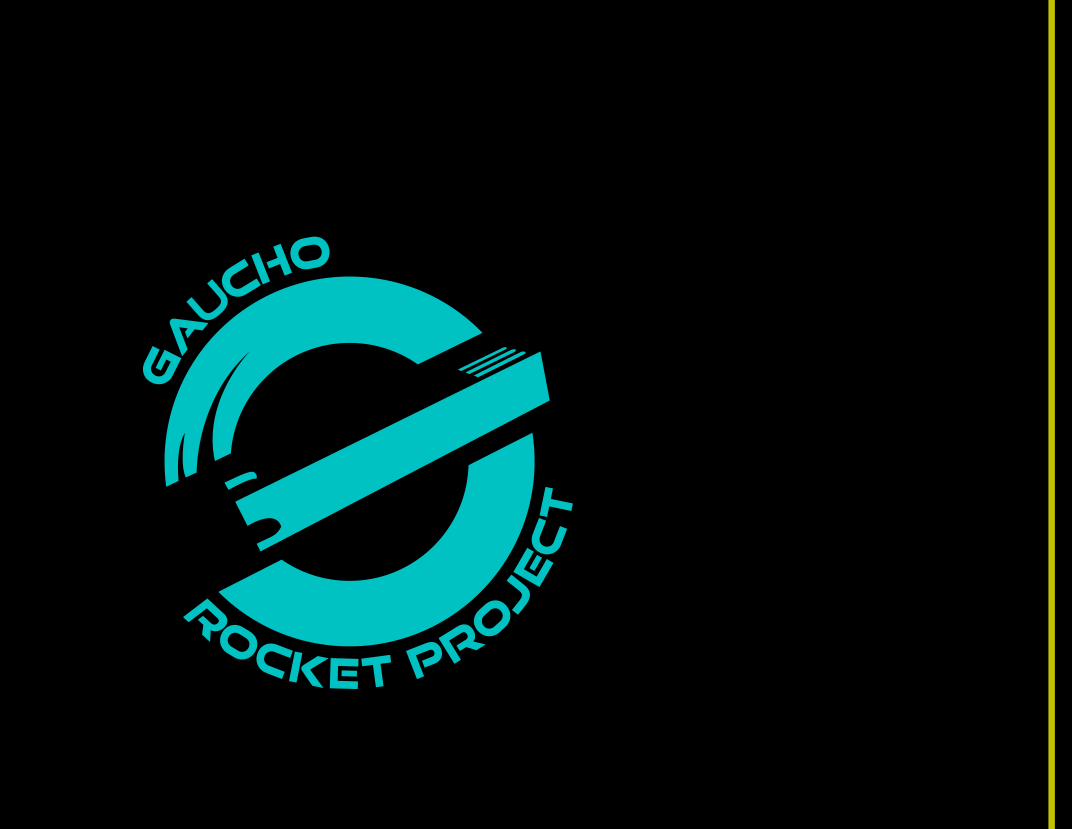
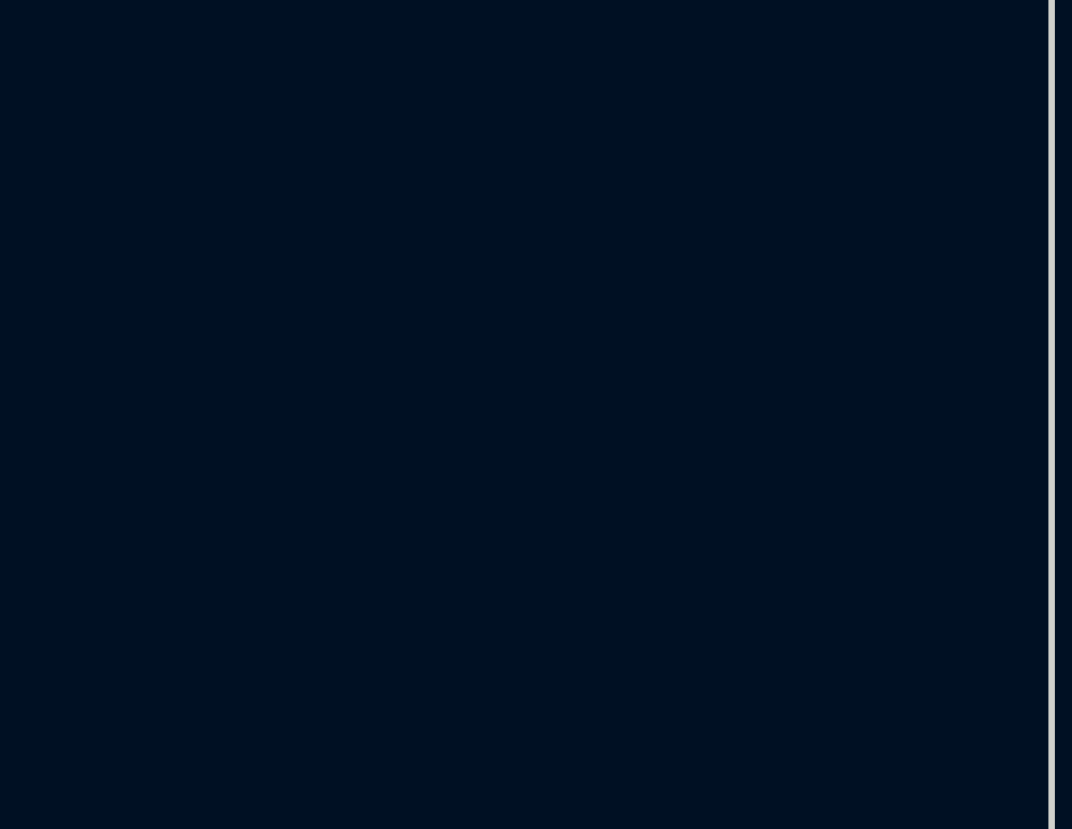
drawing: [142, 236, 573, 690] -> none

